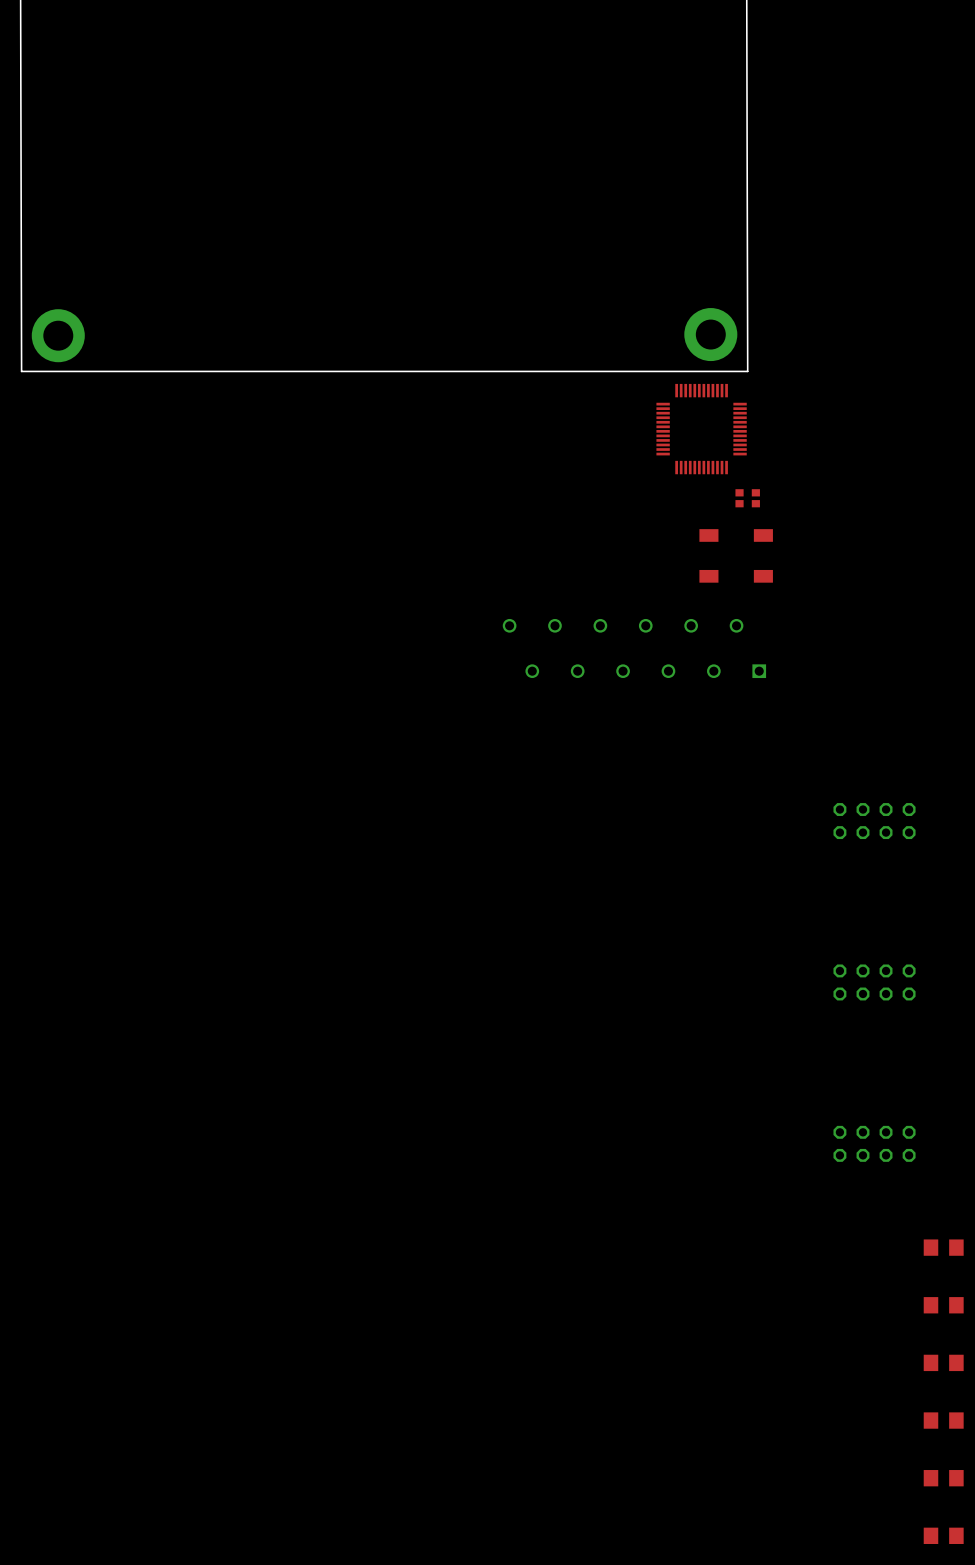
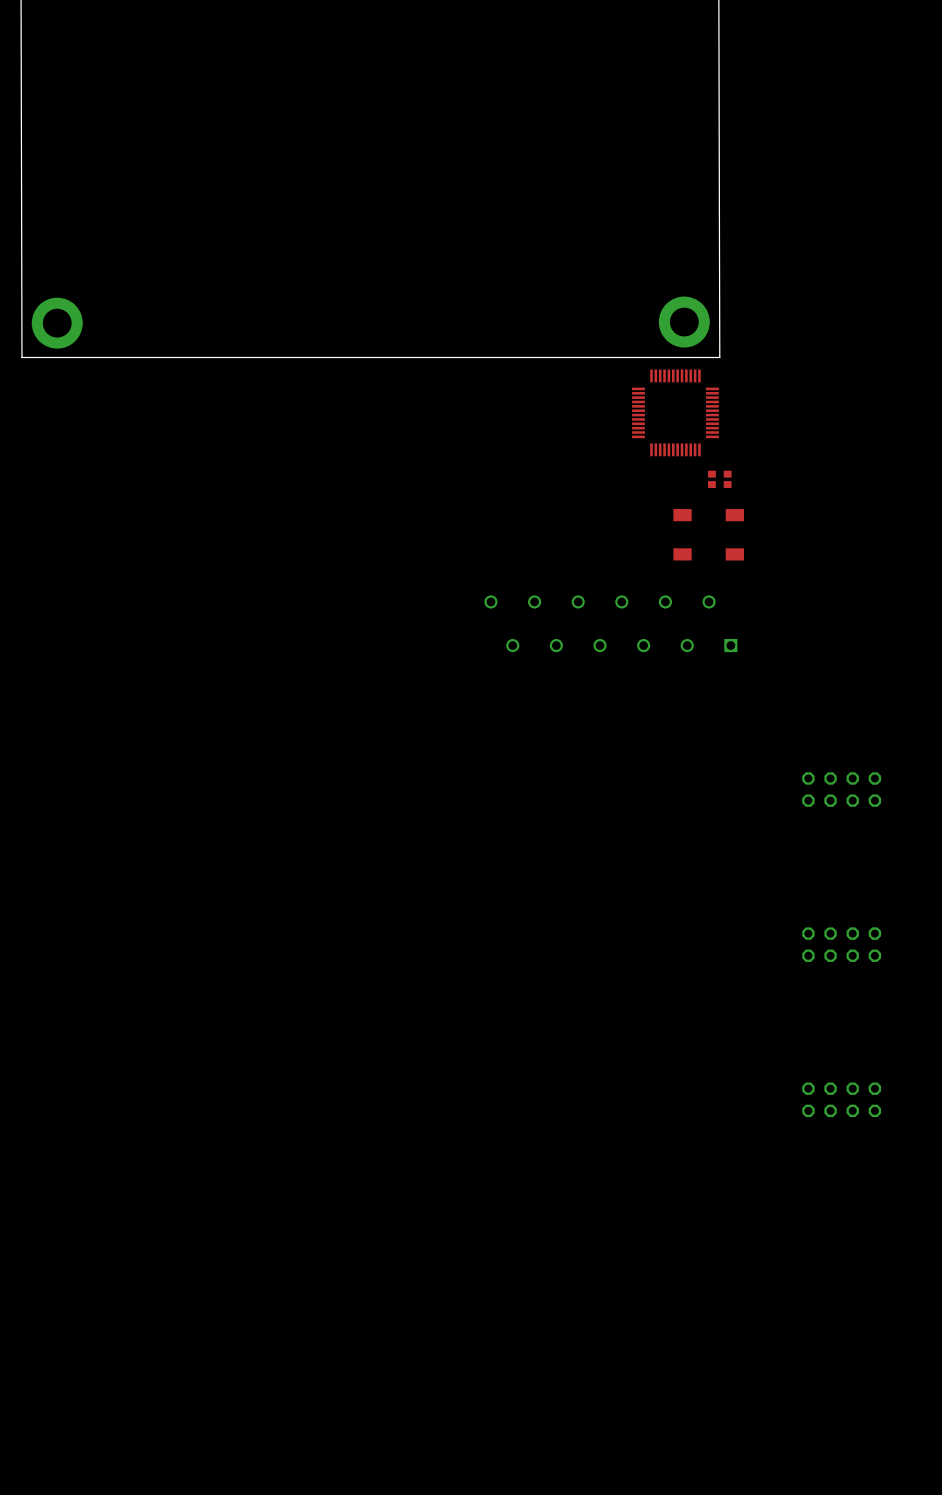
part: (943, 1247) -> none
part: (943, 1305) -> none
part: (943, 1362) -> none
part: (943, 1420) -> none
part: (943, 1478) -> none
part: (943, 1535) -> none

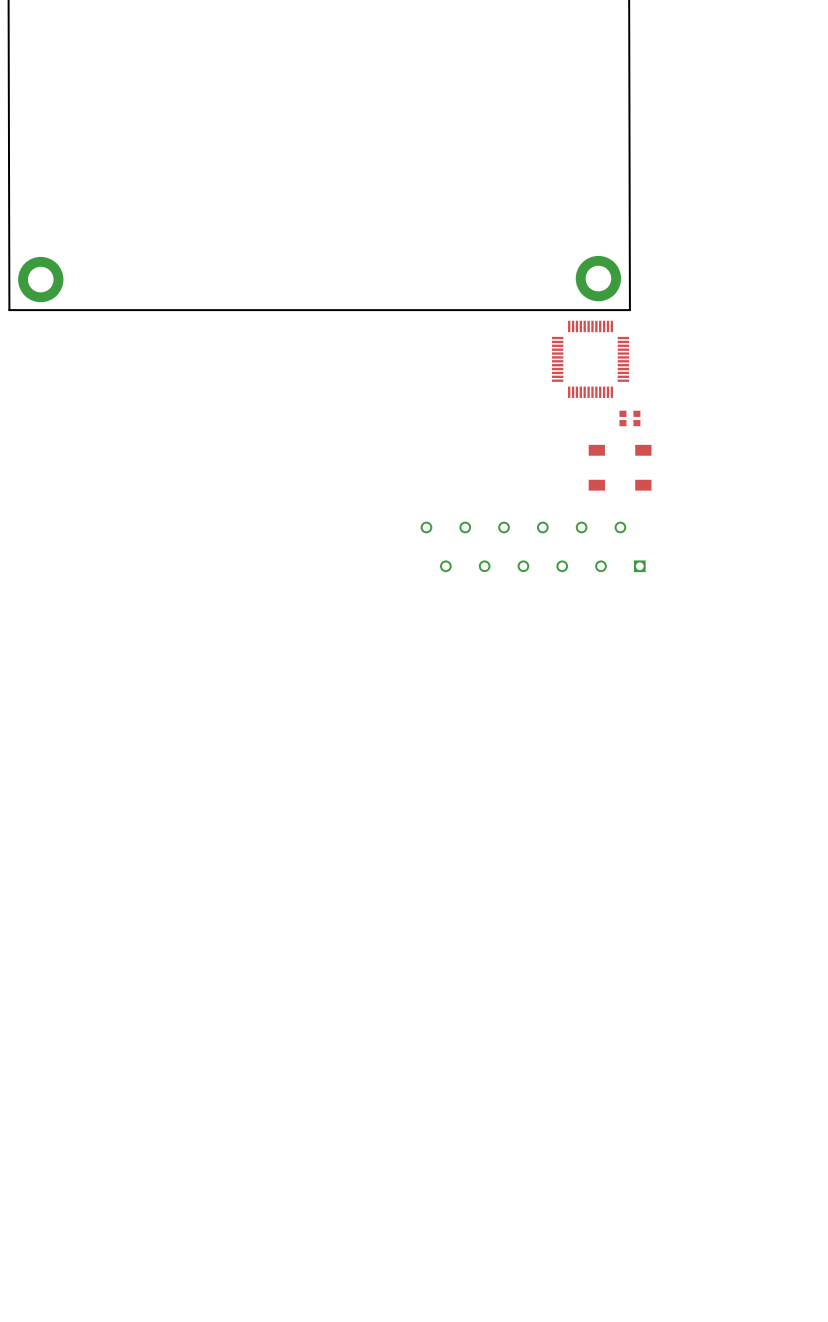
part: (841, 789) -> none
part: (841, 944) -> none
part: (841, 1099) -> none

